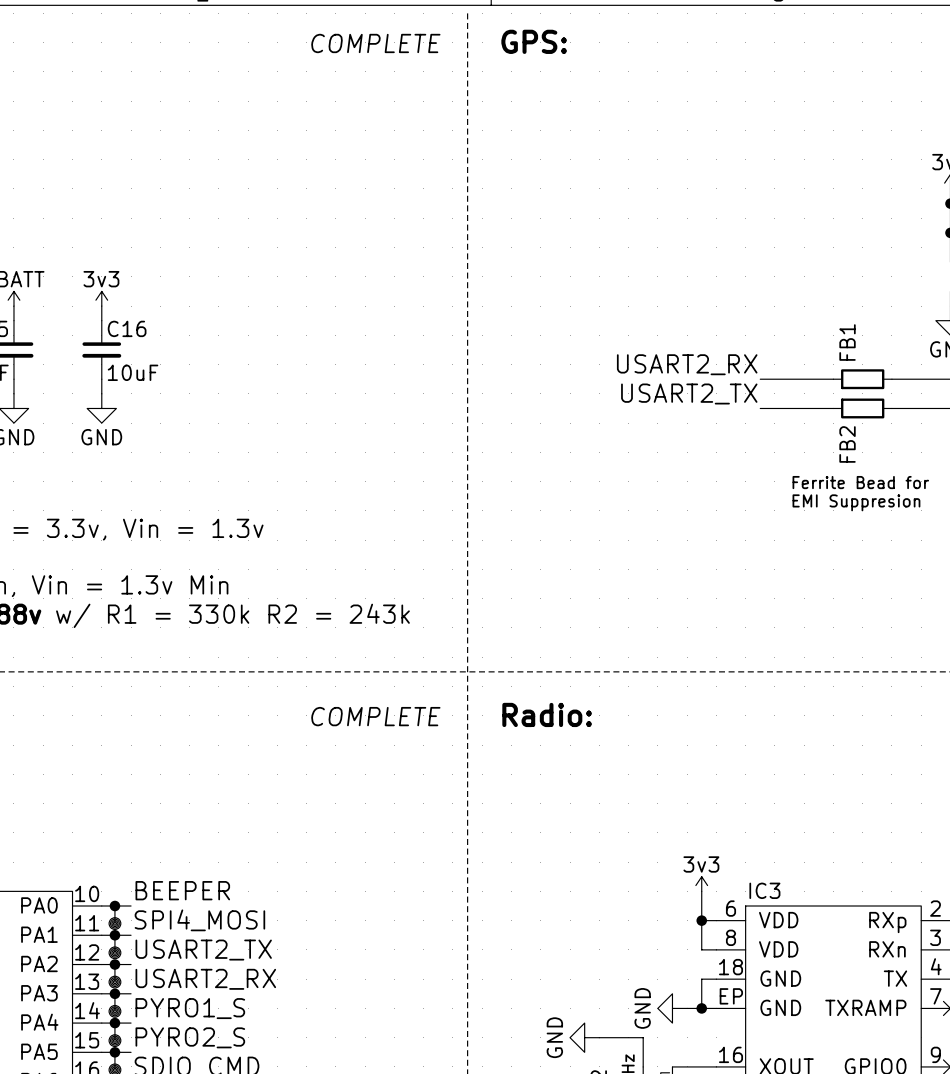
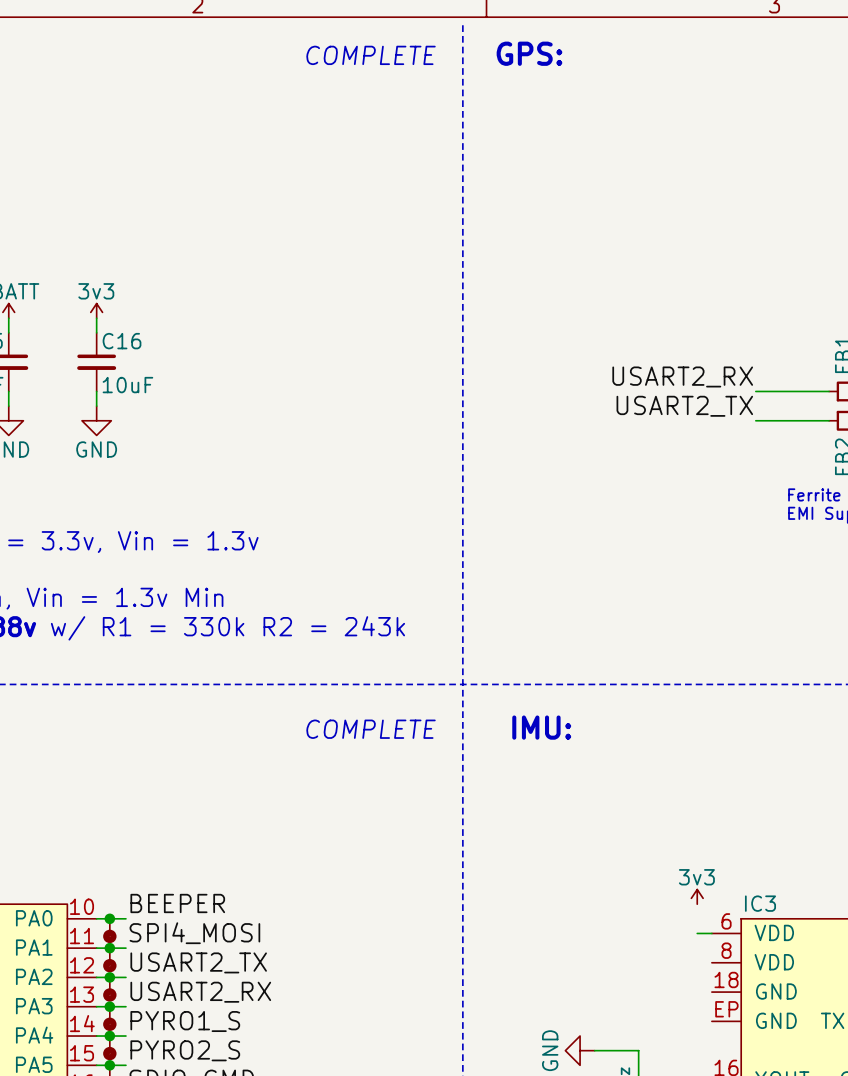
text: none -> IMU: (541, 727)
text: Radio: (547, 714) -> none
wire: (701, 891) (701, 949) (716, 949) -> none
junction: (701, 920) -> none
wire: (716, 979) (701, 979) (701, 1008) -> none
power symbol: GND (672, 1008) -> none
wire: (687, 1008) (716, 1008) -> none
junction: (701, 1008) -> none

